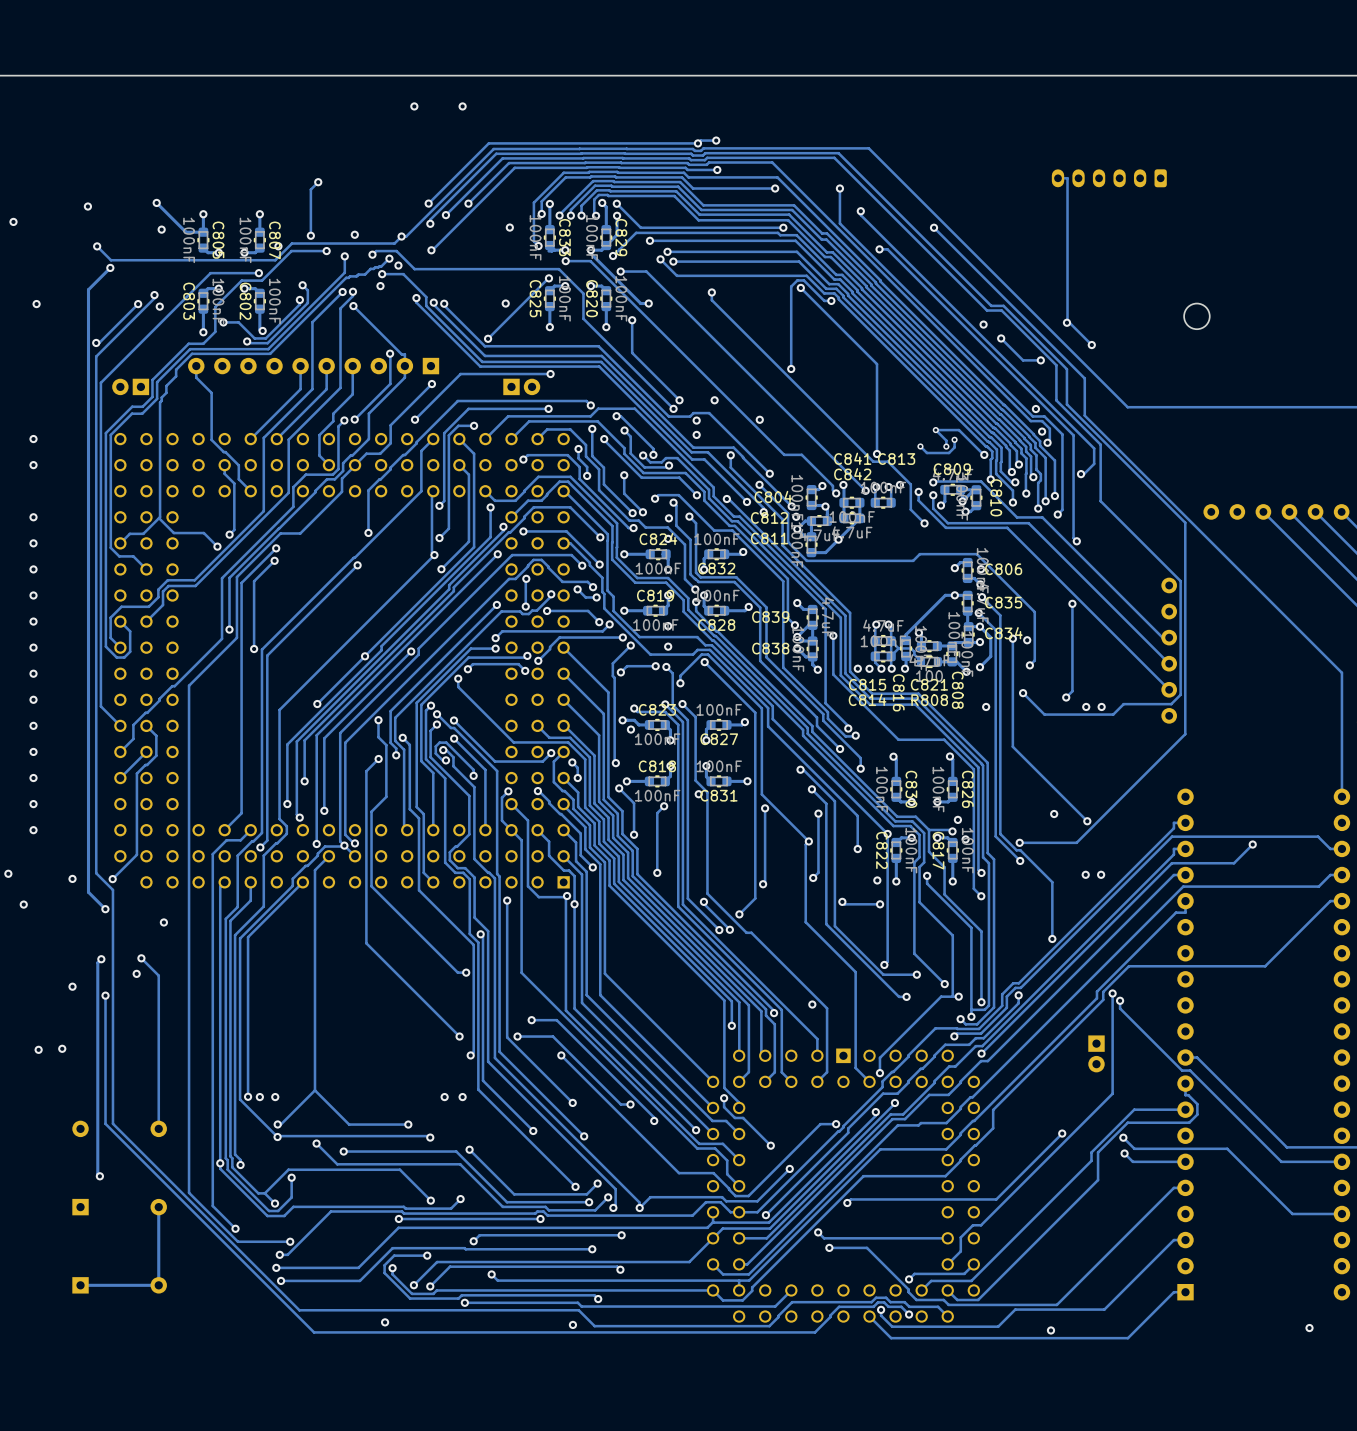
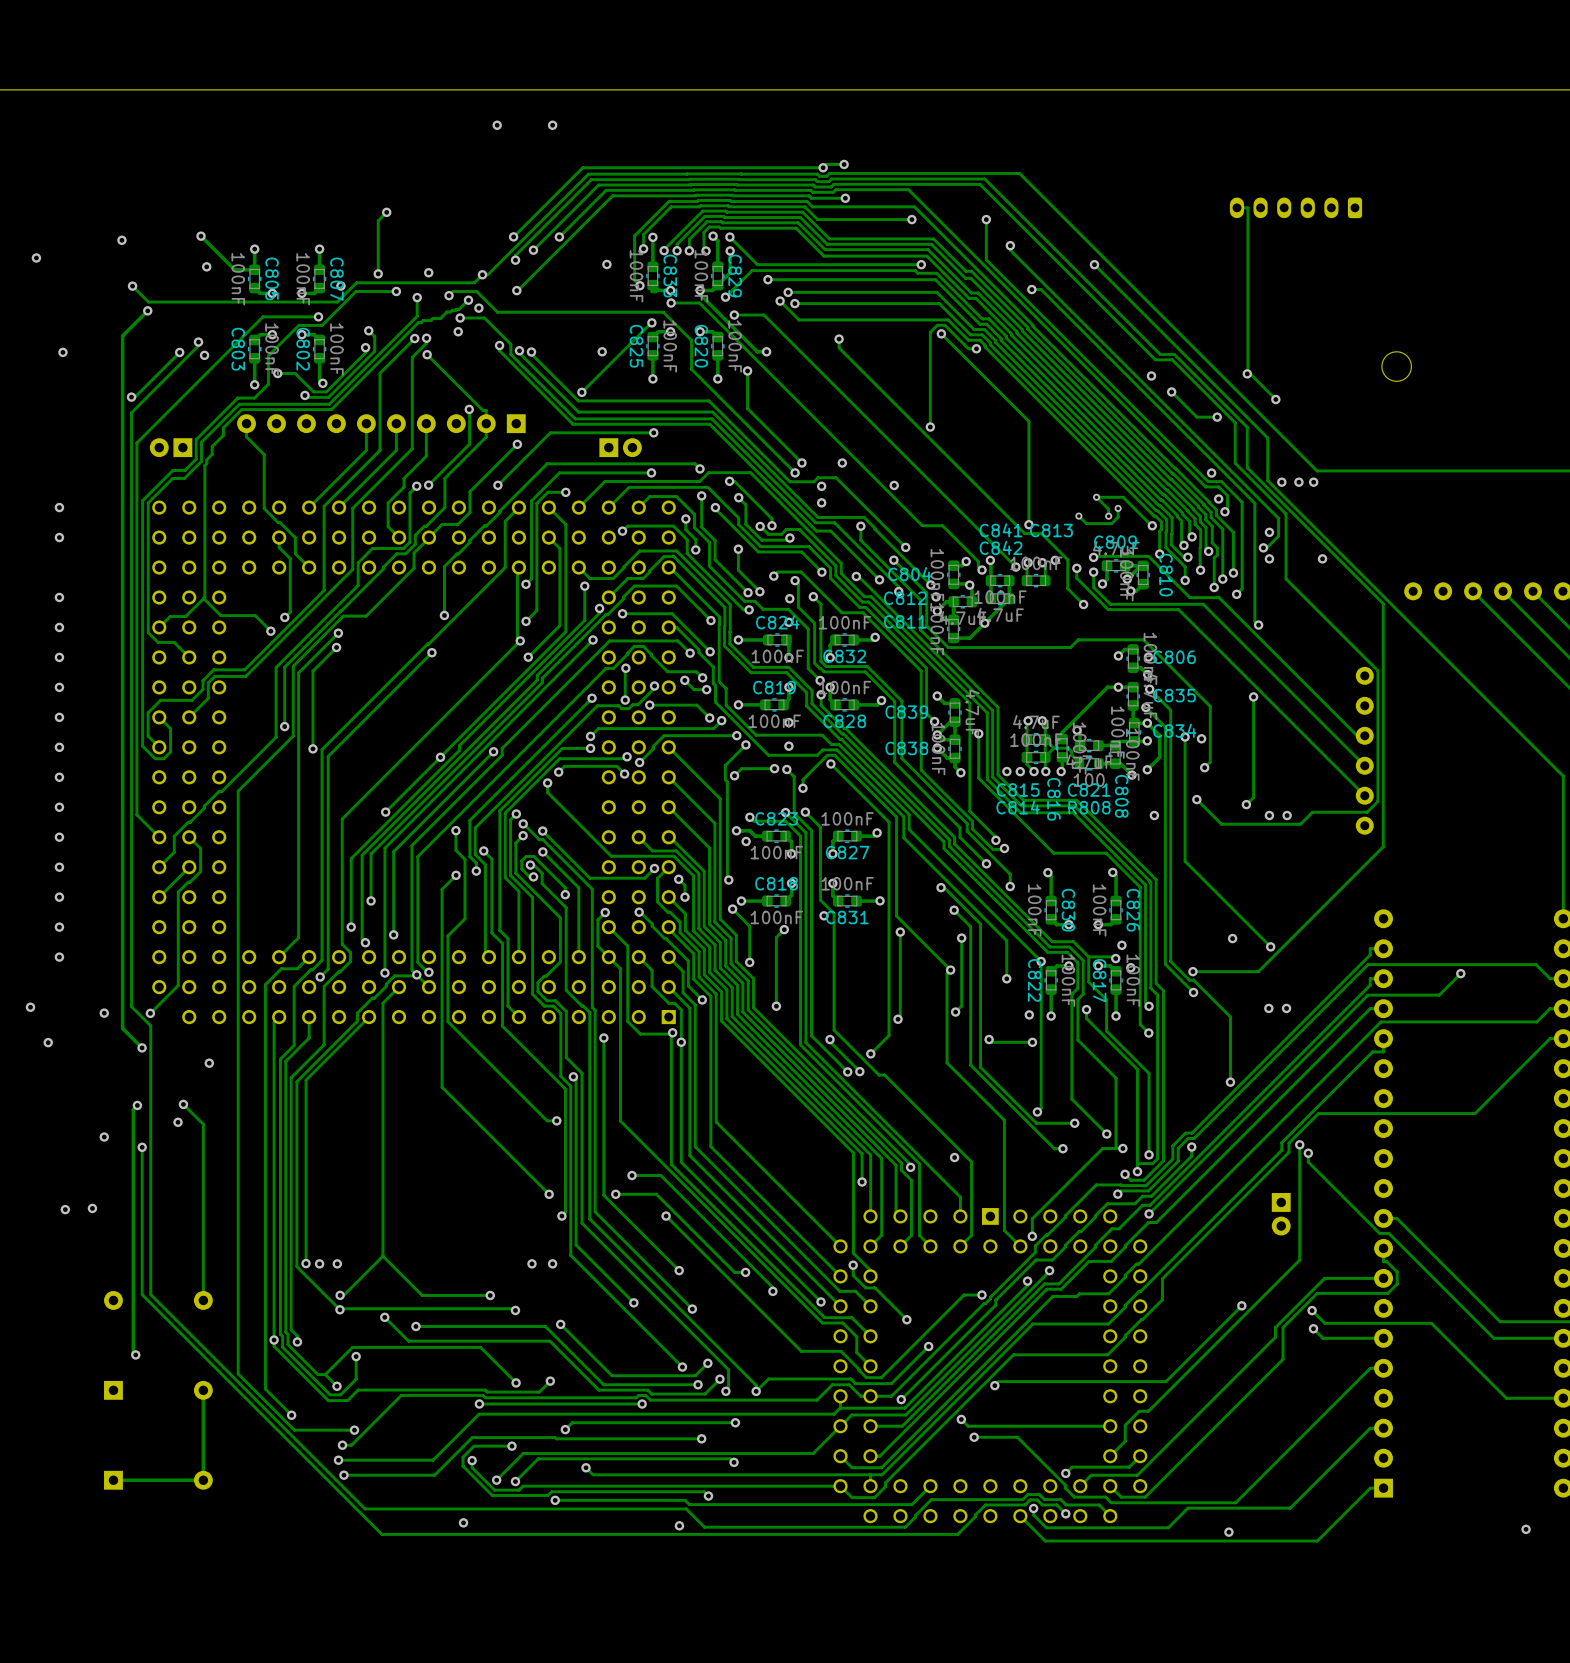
via: none -> (1281, 482)
via: none -> (1298, 482)
via: none -> (1313, 482)
via: none -> (1269, 532)
via: none -> (1269, 558)
via: none -> (1322, 558)

